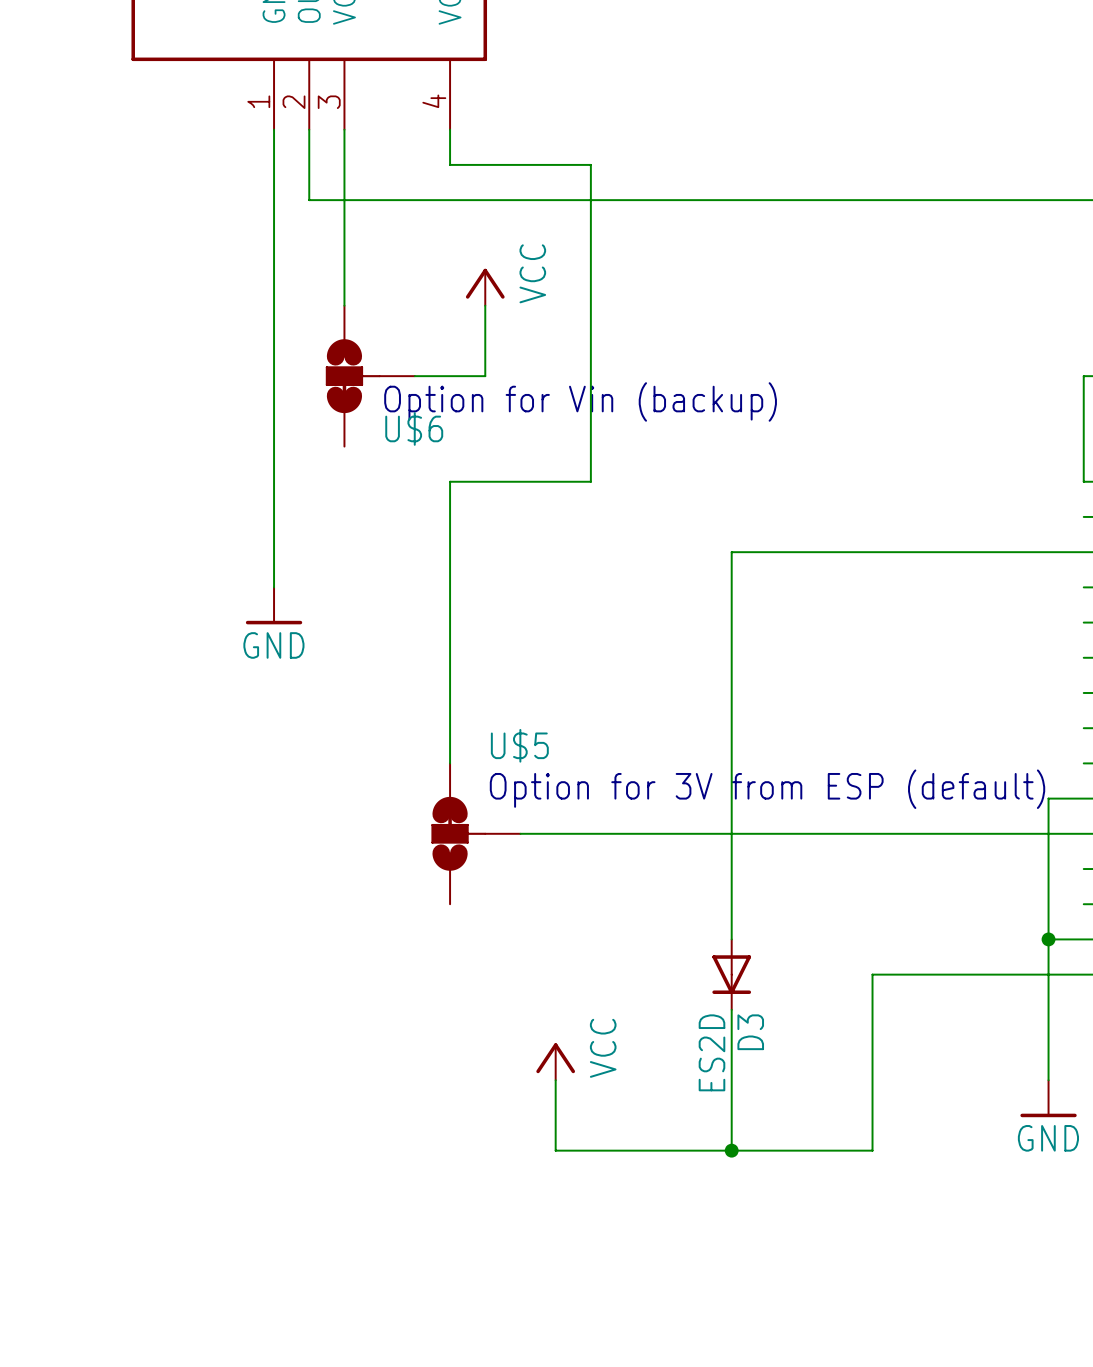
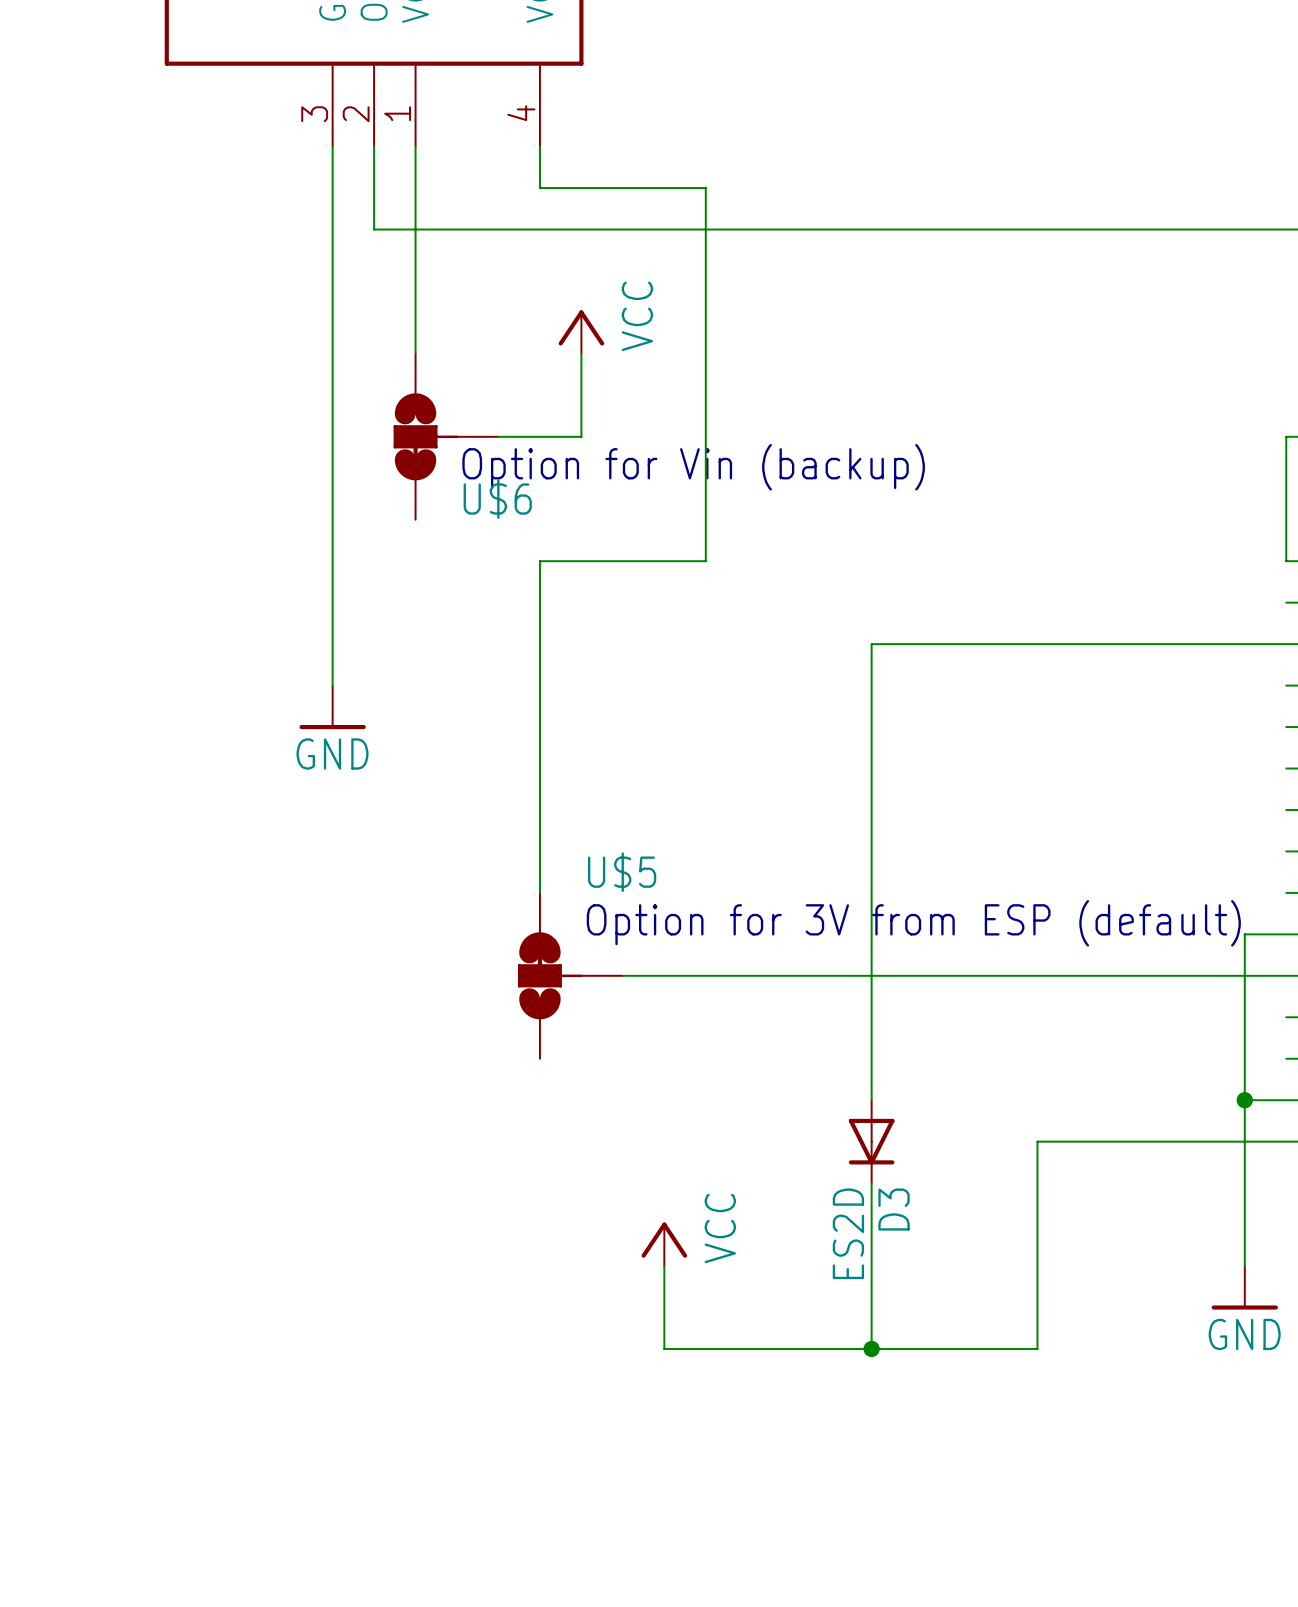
part pin number: 1 (258, 101) -> 3 (314, 114)
part pin number: 3 (329, 102) -> 1 (397, 113)

